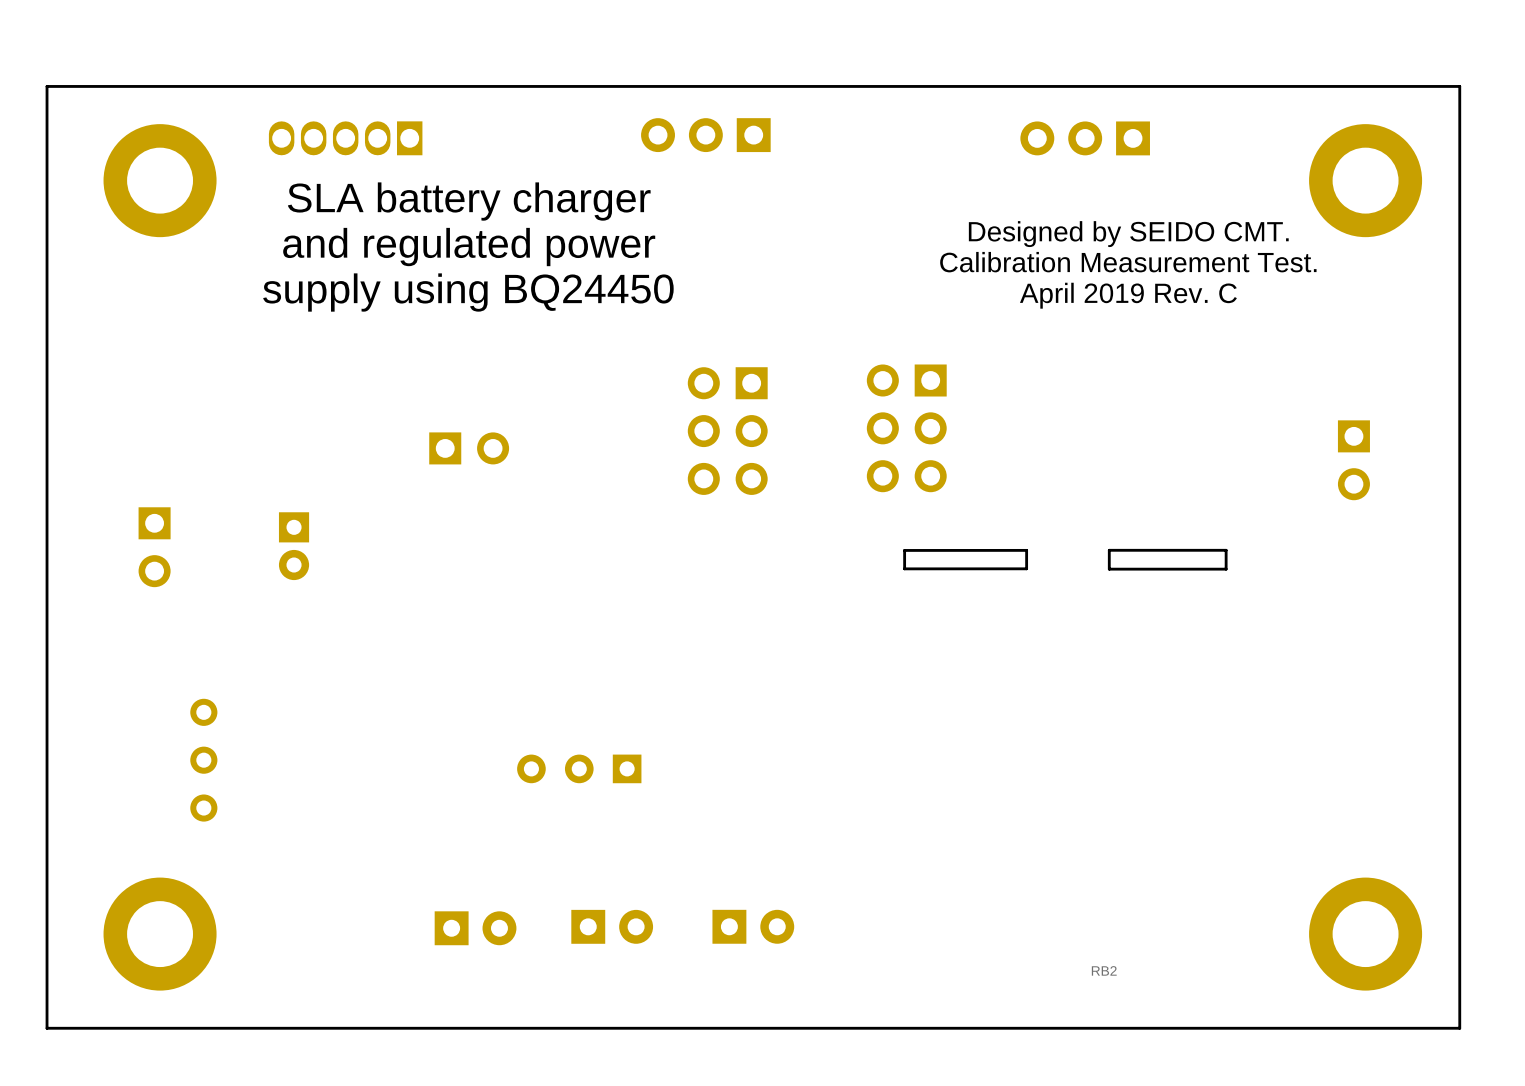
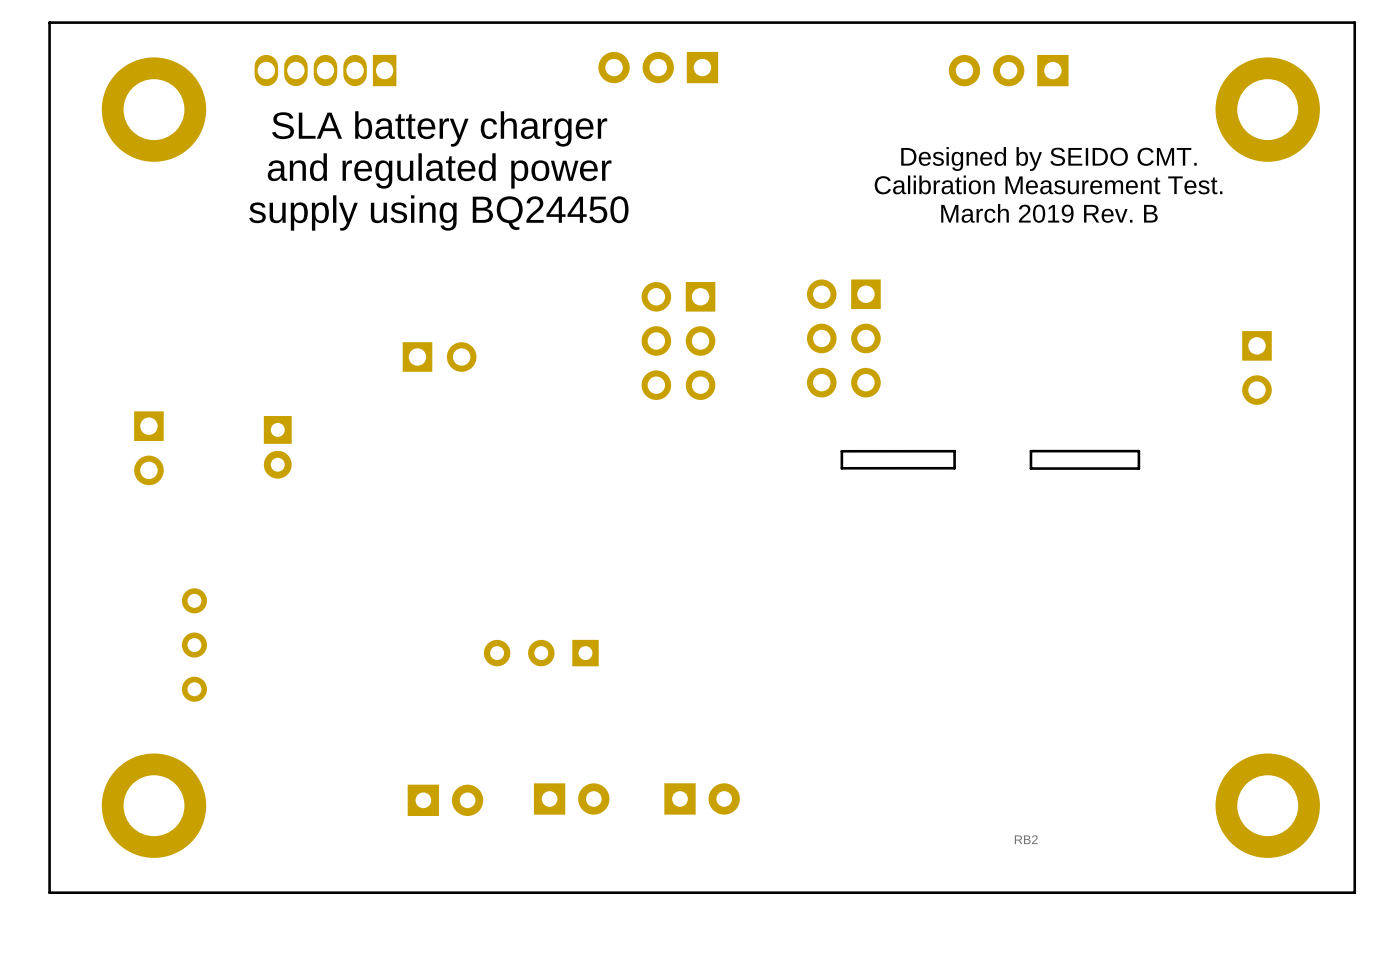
text: April 2019 Rev. C (1128, 295) -> March 2019 Rev. B (1049, 213)

